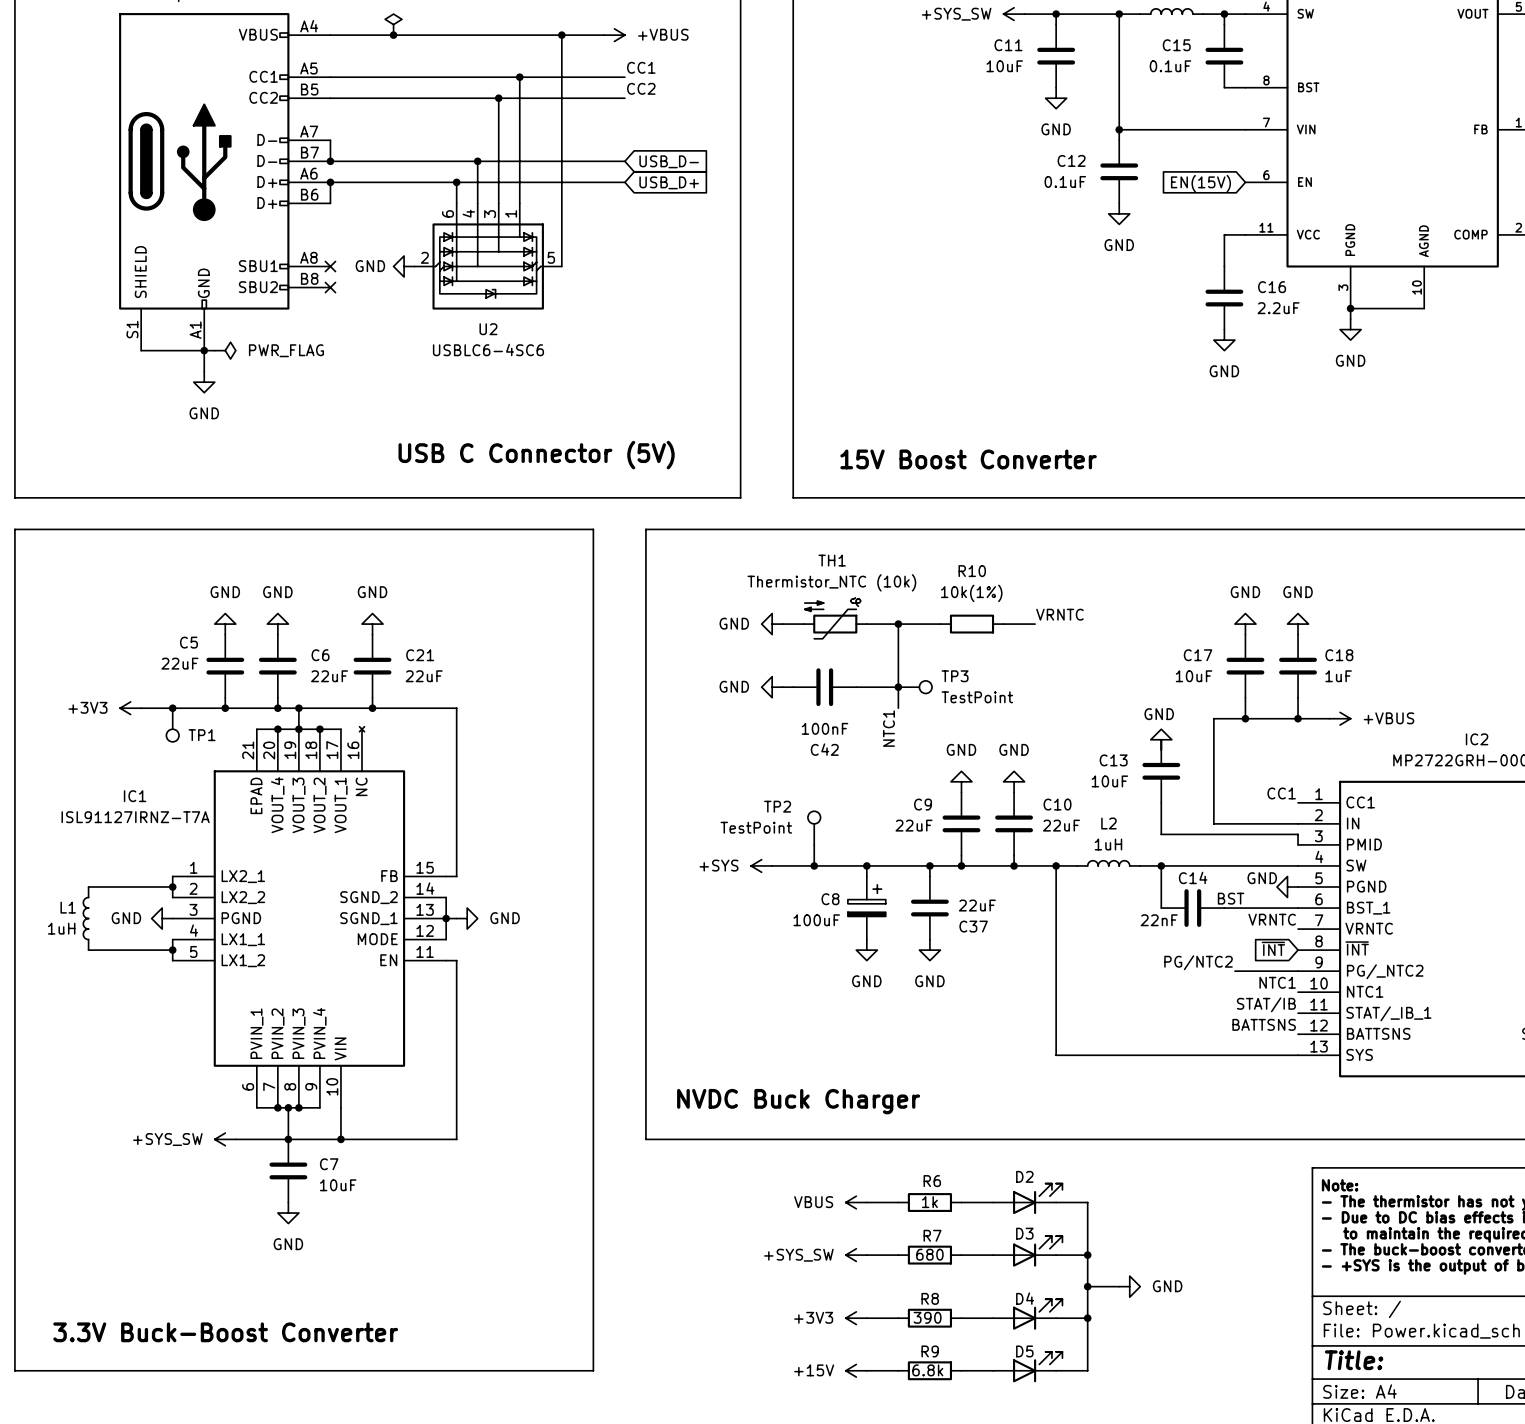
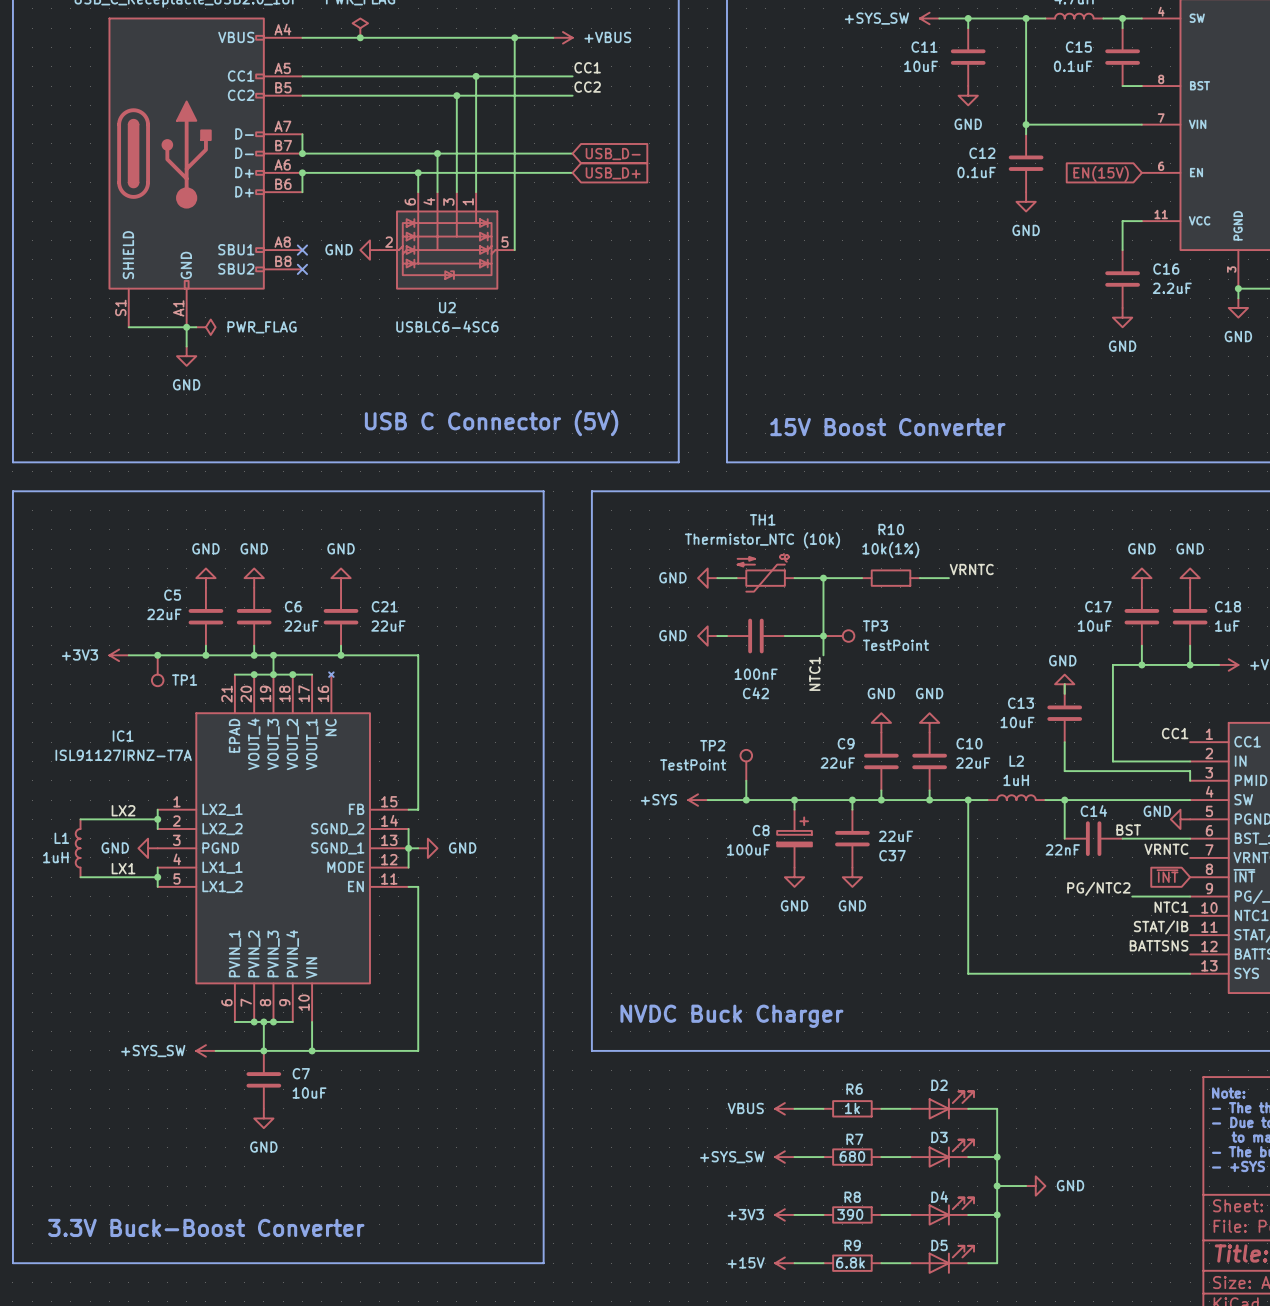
label: none -> LX2 (123, 810)
label: none -> LX1 (123, 868)

